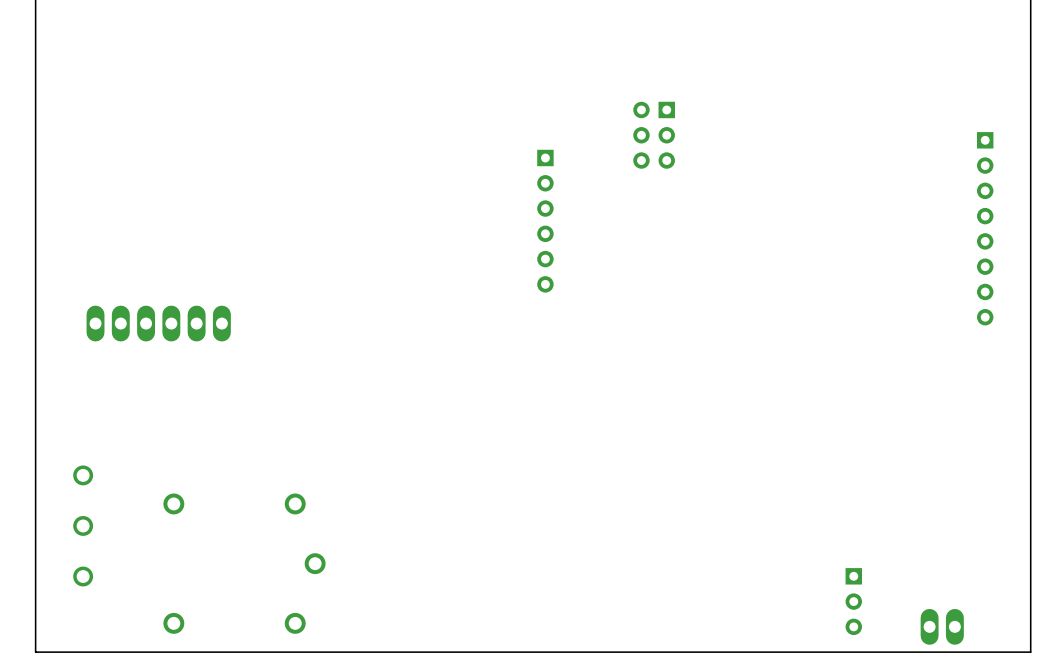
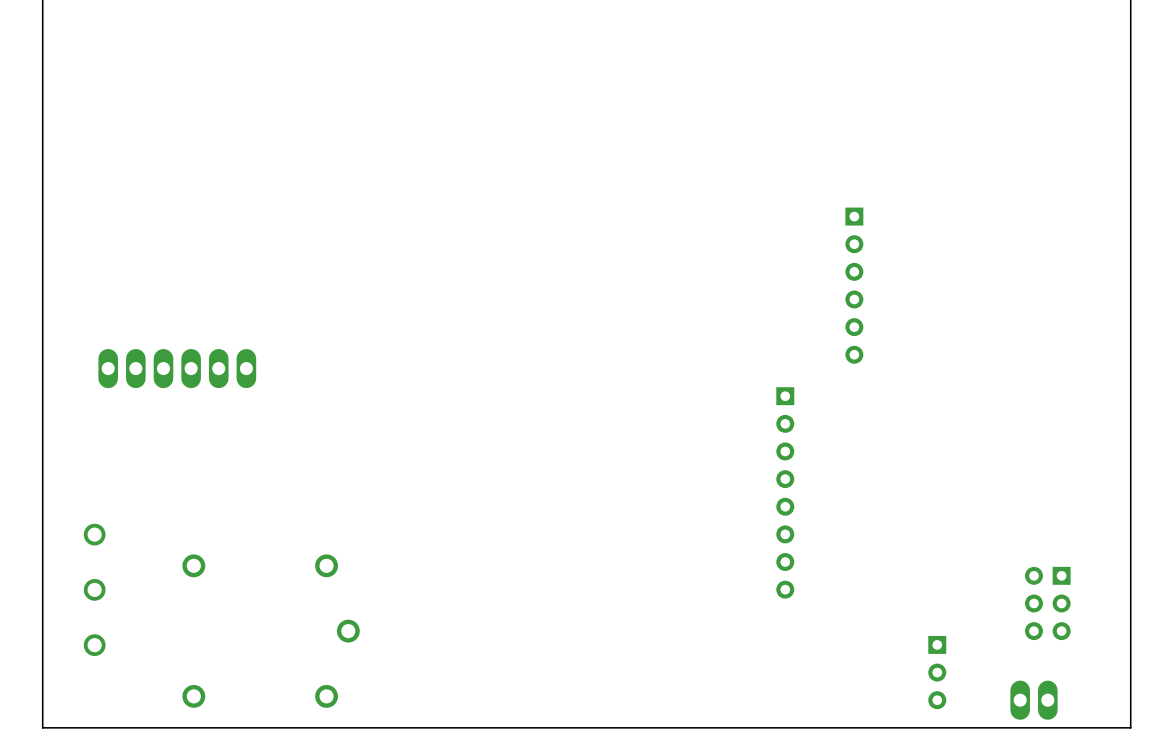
part: (654, 135) -> none
part position: (545, 221) -> (854, 285)
part: (985, 228) -> none
part: none -> (785, 492)
part: none -> (1047, 603)

